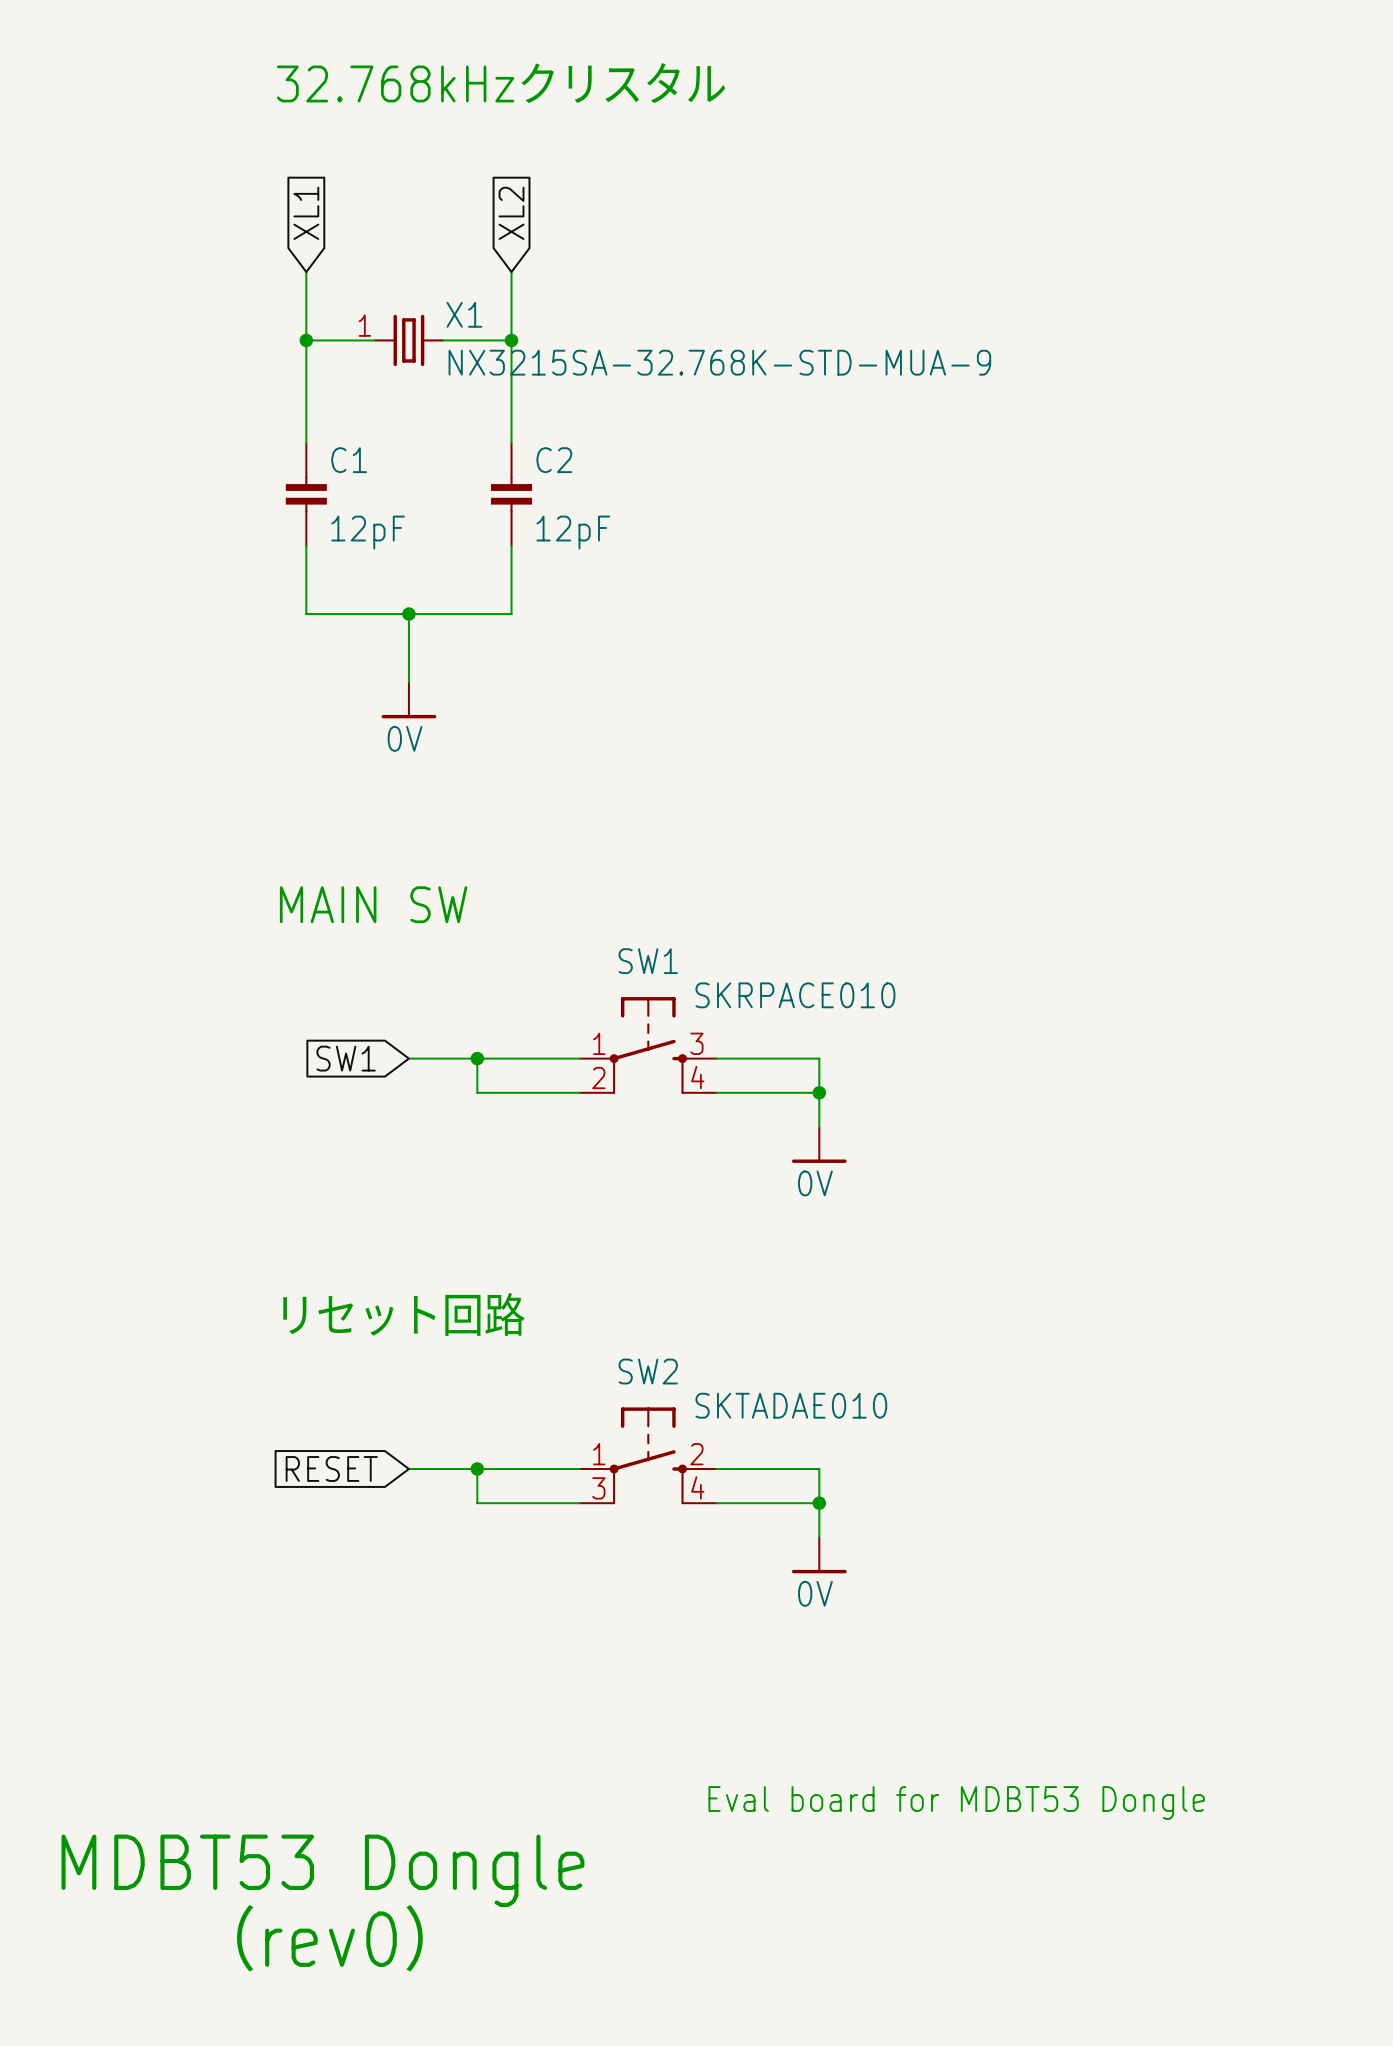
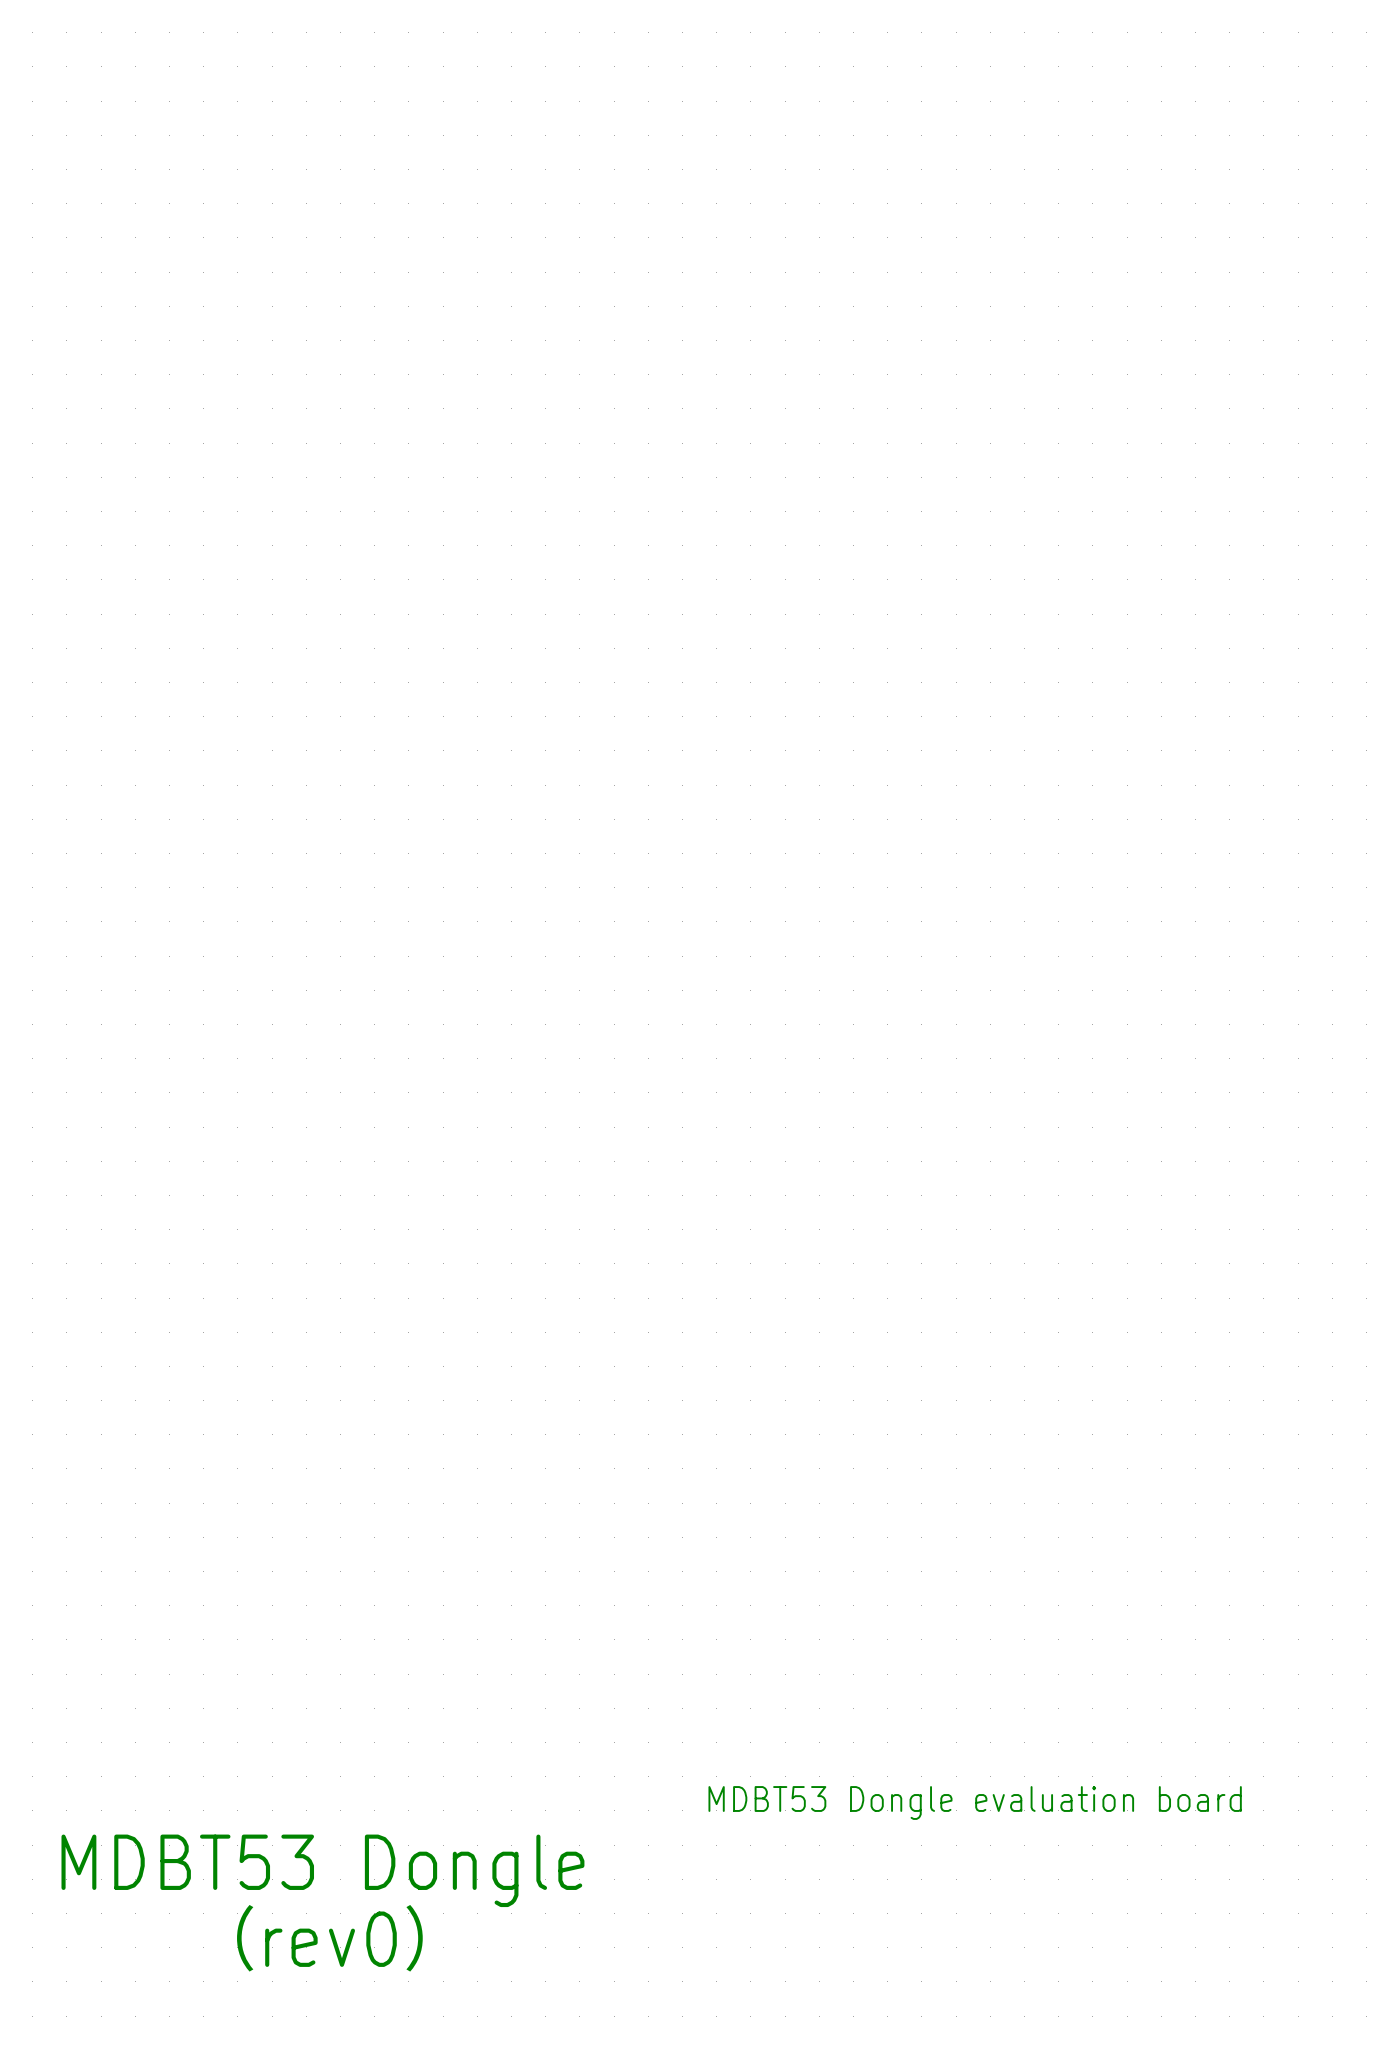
text: 32.768kHzクリスタル (501, 83) -> none
global label: XL1 (306, 213) -> none
global label: XL2 (511, 213) -> none
wire: (306, 272) (306, 443) -> none
wire: (511, 272) (511, 443) -> none
wire: (306, 340) (374, 340) -> none
junction: (306, 340) -> none
X1: NX3215SA-32.768K-STD-MUA-9 (408, 340) -> none
wire: (443, 340) (511, 340) -> none
junction: (511, 340) -> none
C1: 12pF (306, 494) -> none
C2: 12pF (511, 494) -> none
wire: (306, 545) (306, 614) (511, 614) (511, 545) -> none
wire: (408, 614) (408, 682) -> none
junction: (408, 614) -> none
power symbol: 0V (408, 700) -> none
text: MAIN SW (373, 904) -> none
SW1: SKRPACE010 (648, 1045) -> none
global label: SW1 (346, 1058) -> none
wire: (408, 1058) (579, 1058) -> none
wire: (477, 1058) (477, 1092) (579, 1092) -> none
junction: (477, 1058) -> none
wire: (716, 1058) (819, 1058) (819, 1127) -> none
wire: (716, 1092) (819, 1092) -> none
junction: (819, 1092) -> none
power symbol: 0V (819, 1144) -> none
text: リセット回路 (403, 1314) -> none
SW2: SKTADAE010 (648, 1455) -> none
global label: RESET (331, 1468) -> none
wire: (408, 1468) (579, 1468) -> none
wire: (477, 1468) (477, 1503) (579, 1503) -> none
junction: (477, 1468) -> none
wire: (716, 1468) (819, 1468) (819, 1537) -> none
wire: (716, 1503) (819, 1503) -> none
junction: (819, 1503) -> none
power symbol: 0V (819, 1555) -> none
text: Eval board for MDBT53 Dongle (956, 1802) -> MDBT53 Dongle evaluation board (975, 1802)

